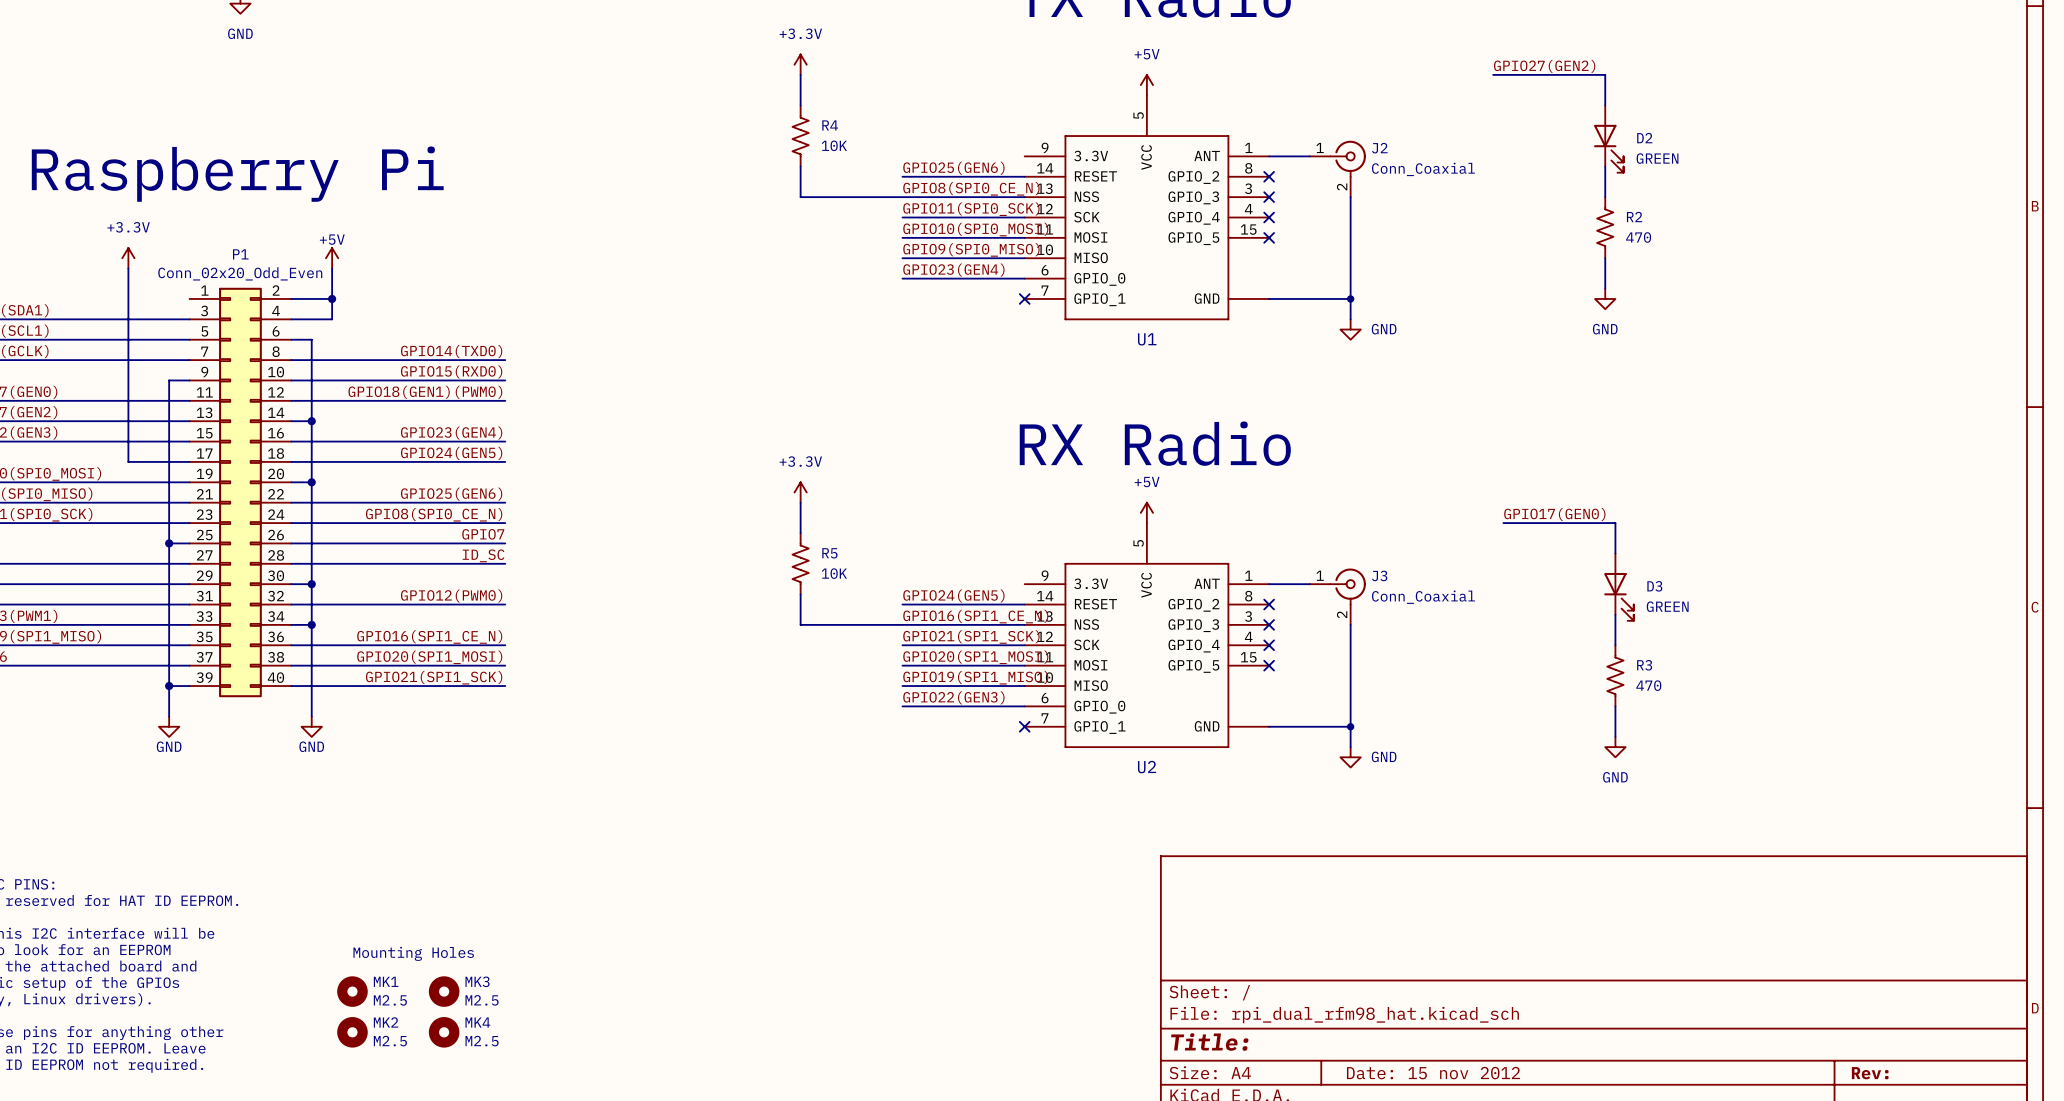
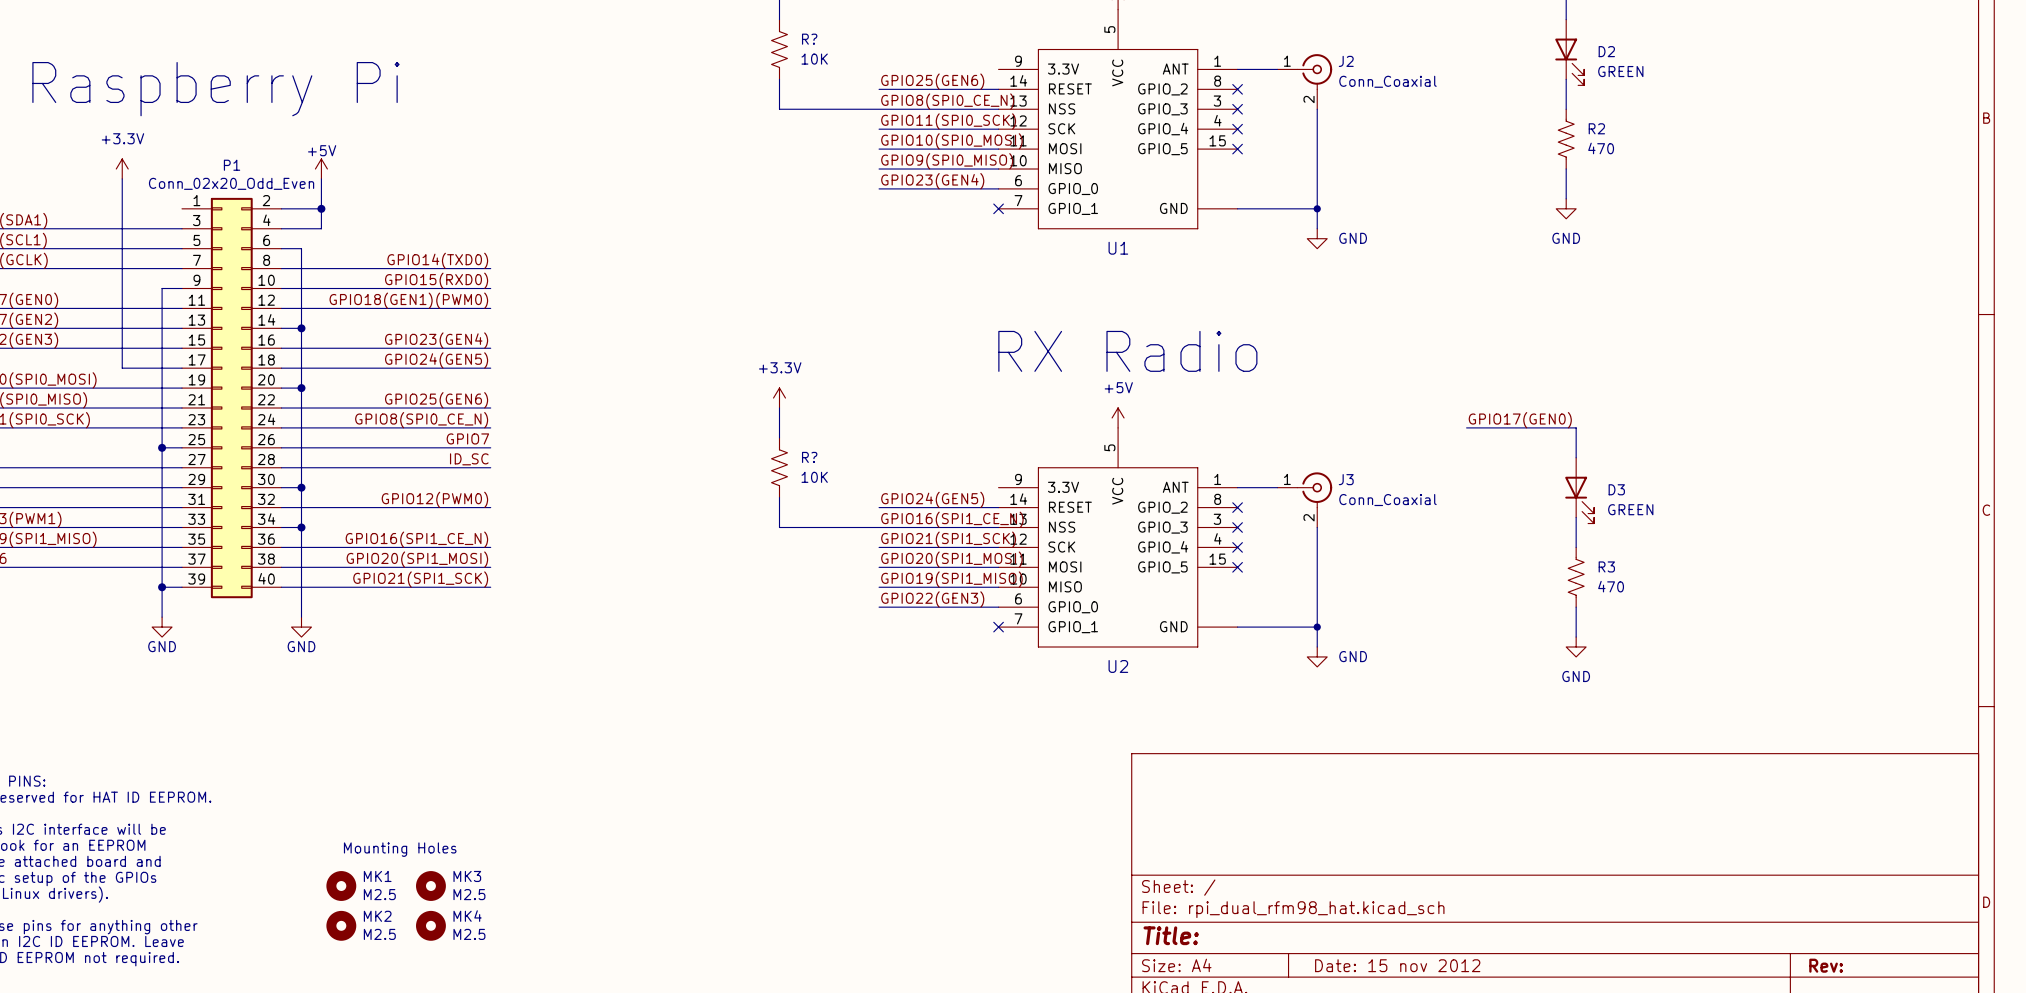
R4 name: R4 (830, 125) -> R? (809, 39)
R5 name: R5 (829, 553) -> R? (809, 457)

